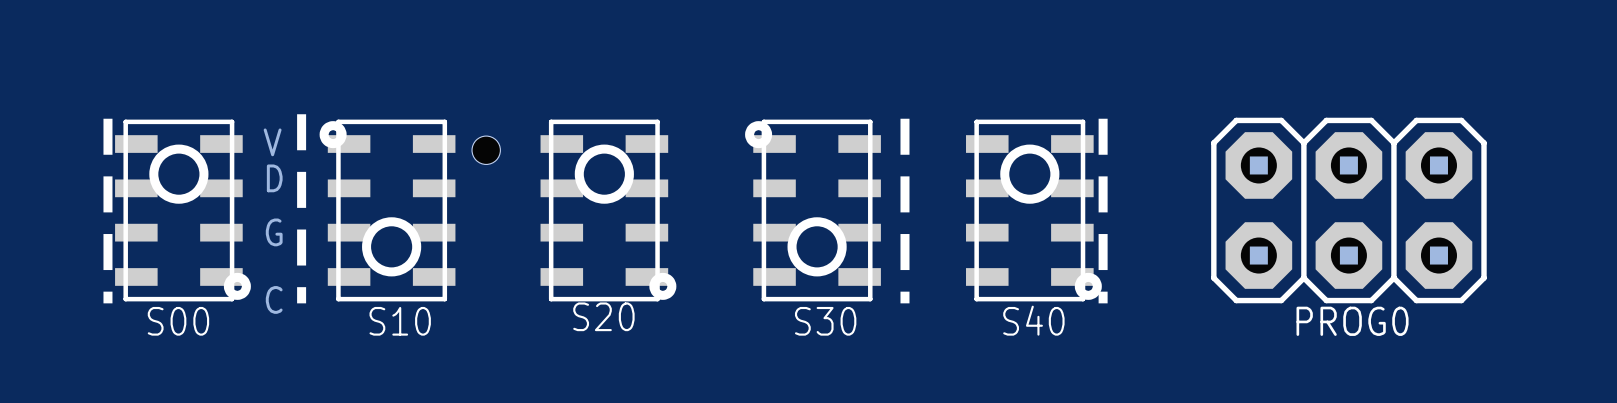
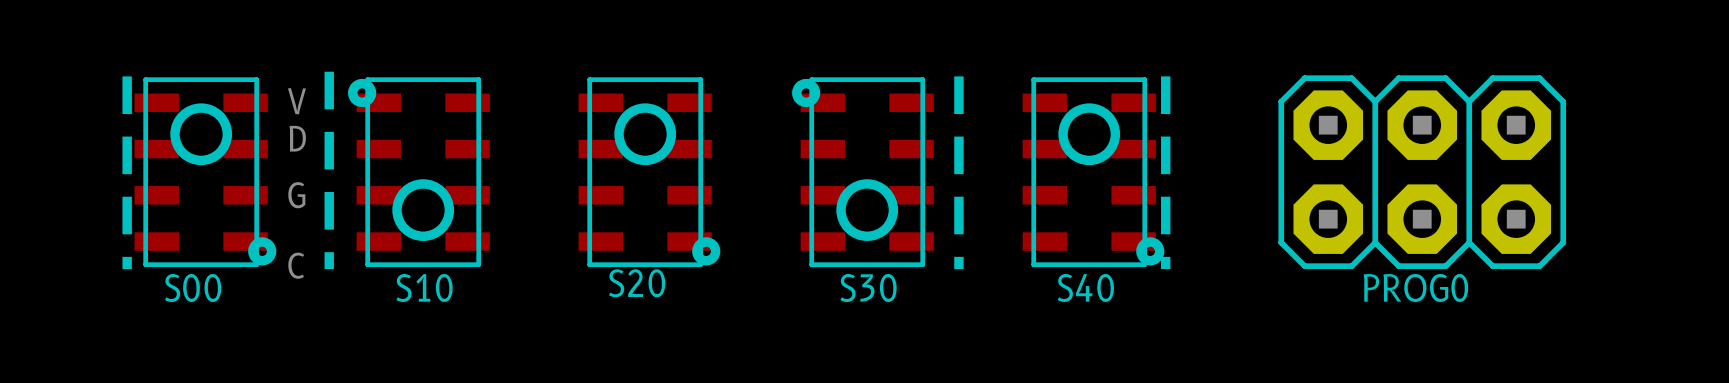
hole: (486, 150) -> none

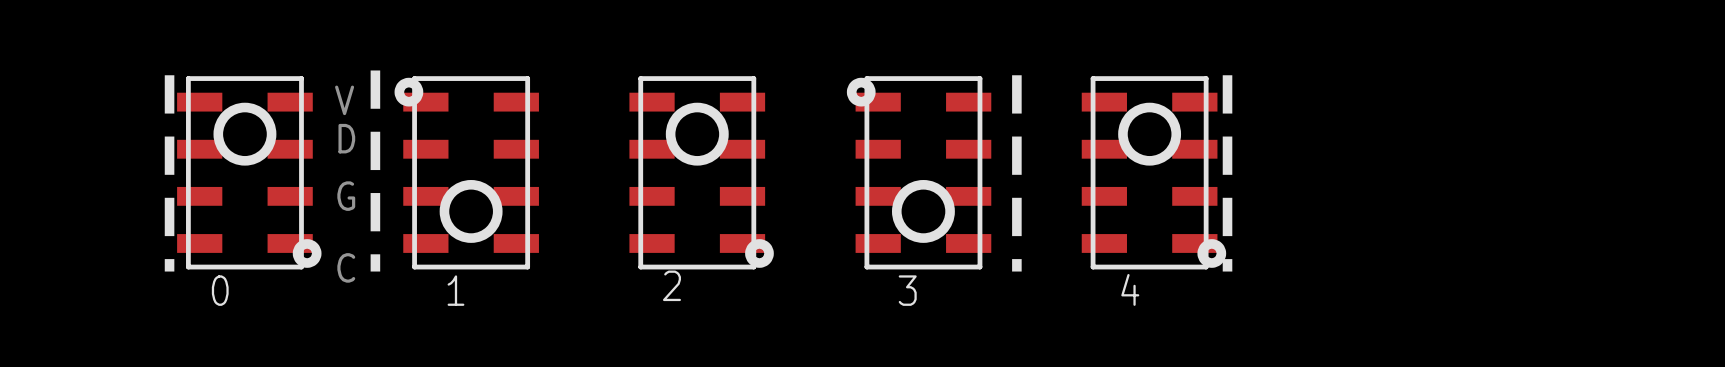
PROG0: (1422, 172) -> none
S20 name: S20 (637, 283) -> 2 (671, 285)
S00 name: S00 (193, 287) -> 0 (220, 290)
S10 name: S10 (424, 287) -> 1 (455, 290)
S30 name: S30 (868, 287) -> 3 (907, 290)
S40 name: S40 (1085, 287) -> 4 (1130, 289)

